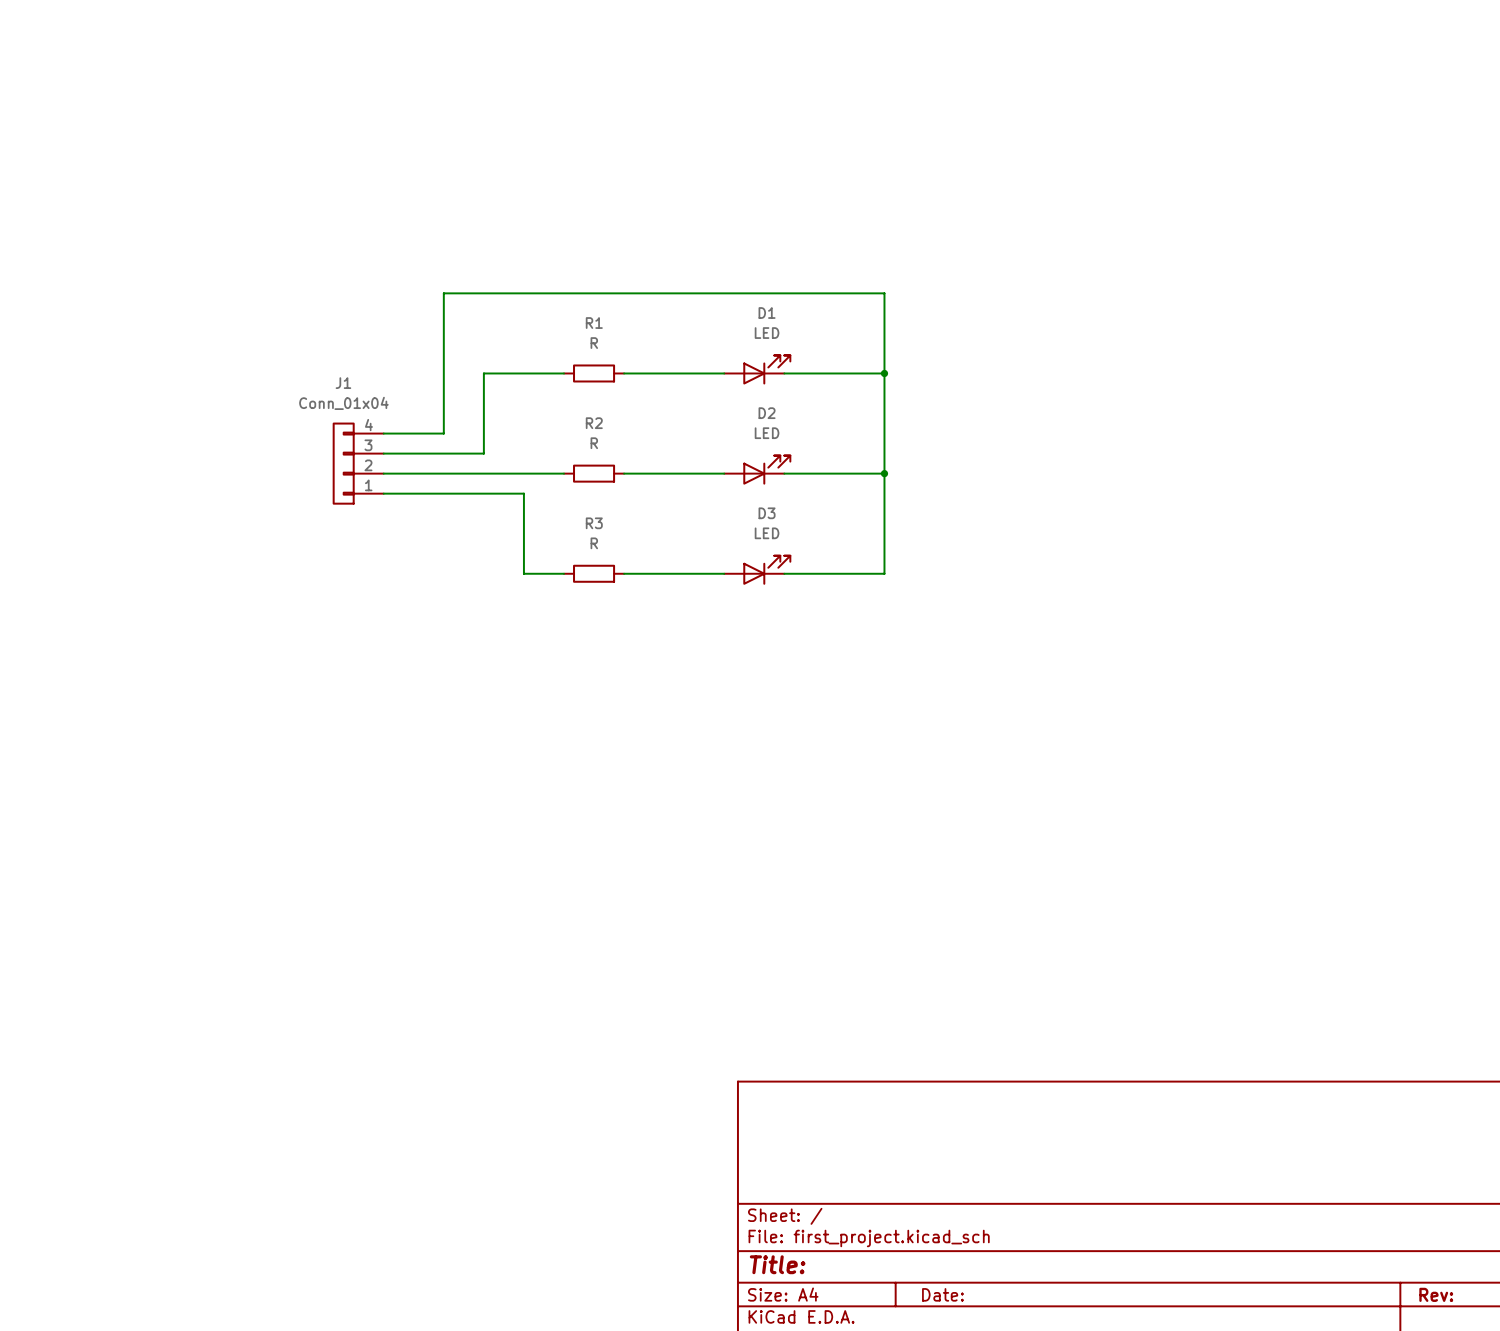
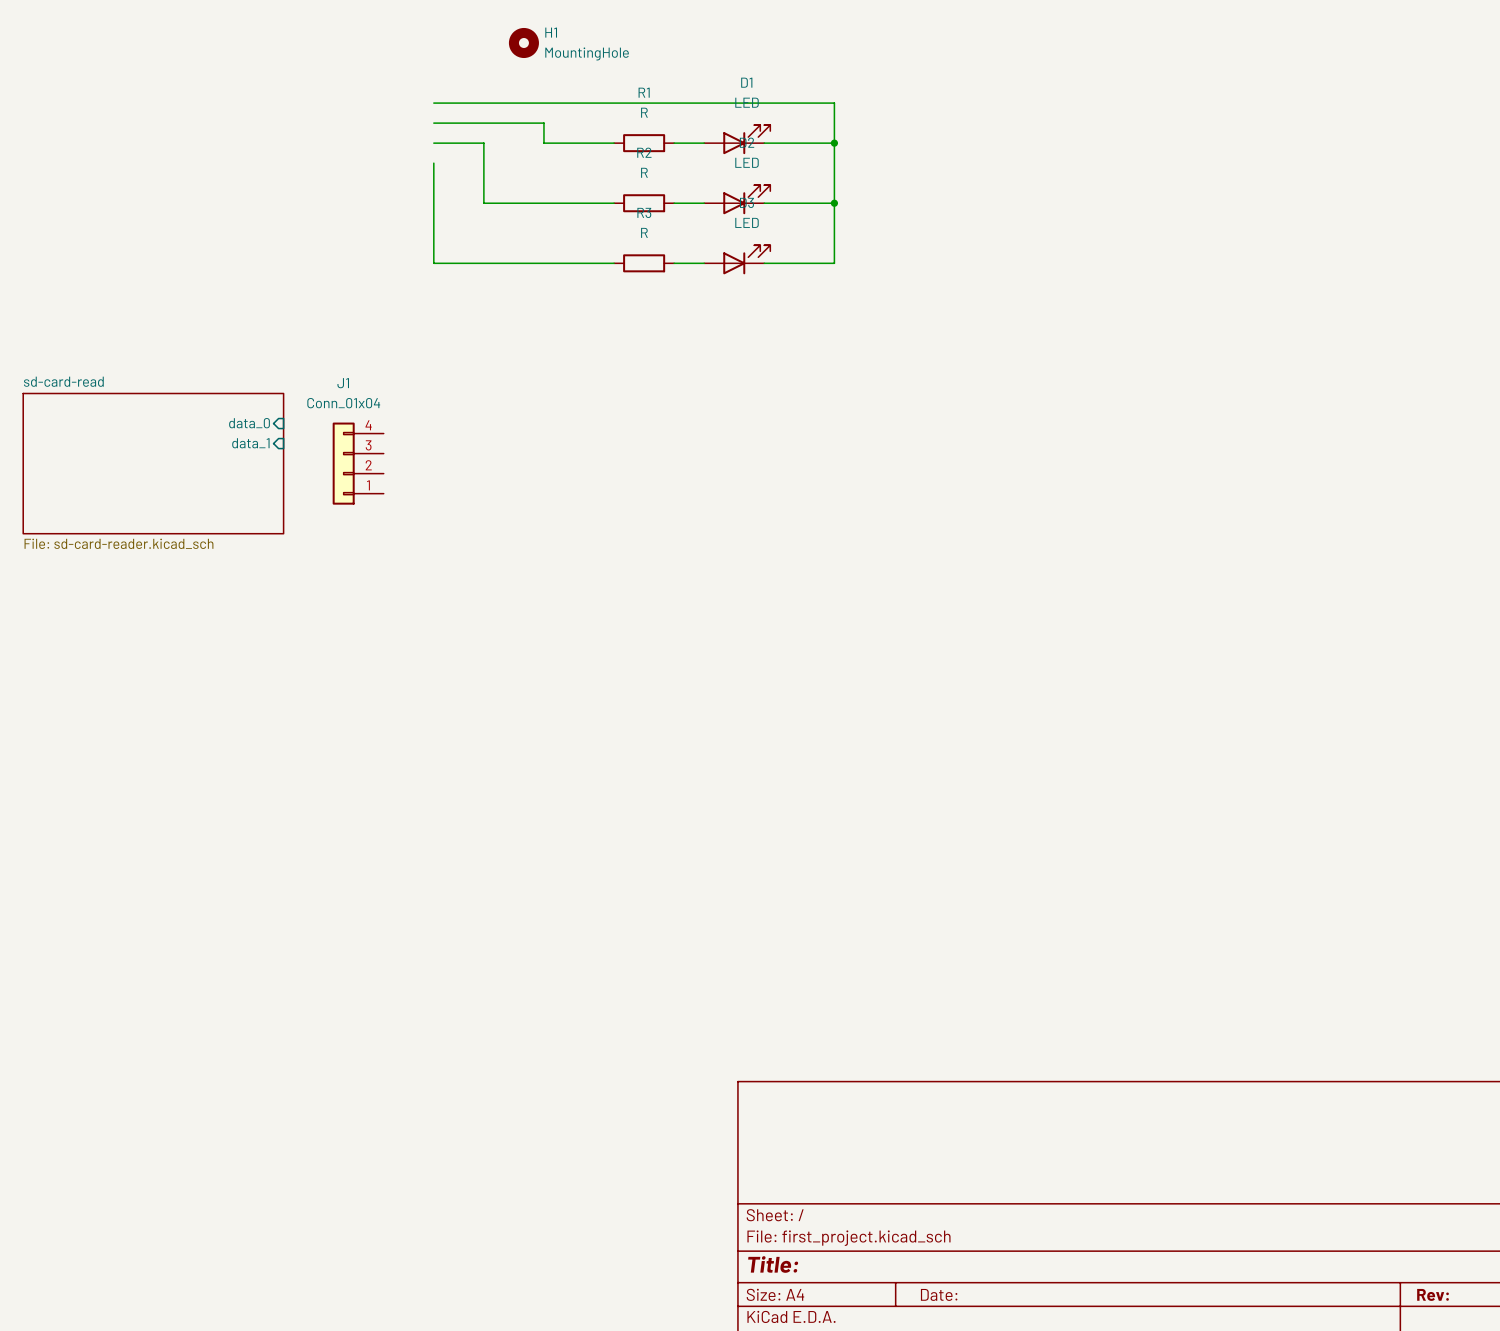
H1: none -> MountingHole (523, 42)
wire: none -> (433, 103) (834, 103) (834, 263) (764, 263)
wire: none -> (433, 123) (543, 123) (543, 143) (614, 143)
wire: none -> (433, 143) (483, 143) (483, 203) (614, 203)
wire: none -> (674, 143) (704, 143)
wire: none -> (764, 143) (834, 143)
junction: none -> (834, 143)
wire: none -> (433, 163) (433, 263) (614, 263)
wire: none -> (674, 203) (704, 203)
wire: none -> (764, 203) (834, 203)
junction: none -> (834, 203)
wire: none -> (674, 263) (704, 263)
D1 position: (757, 369) -> (737, 139)
wire: (564, 373) (483, 373) (483, 453) (383, 453) -> none
R1 position: (594, 373) -> (644, 143)
wire: (624, 373) (724, 373) -> none
wire: (784, 373) (884, 373) -> none
junction: (884, 373) -> none
sheet pin: none -> data_0 (249, 423)
wire: (383, 433) (443, 433) (443, 293) (884, 293) (884, 573) (784, 573) -> none
sheet pin: none -> data_1 (250, 443)
sheet sd-card-read: none -> File: sd-card-reader.kicad_sch (153, 463)
D2 position: (757, 470) -> (737, 199)
wire: (383, 473) (564, 473) -> none
R2 position: (594, 473) -> (644, 203)
wire: (624, 473) (724, 473) -> none
wire: (784, 473) (884, 473) -> none
junction: (884, 473) -> none
wire: (383, 493) (523, 493) (523, 573) (564, 573) -> none
D3 position: (757, 570) -> (737, 259)
R3 position: (594, 573) -> (644, 263)
wire: (624, 573) (724, 573) -> none

